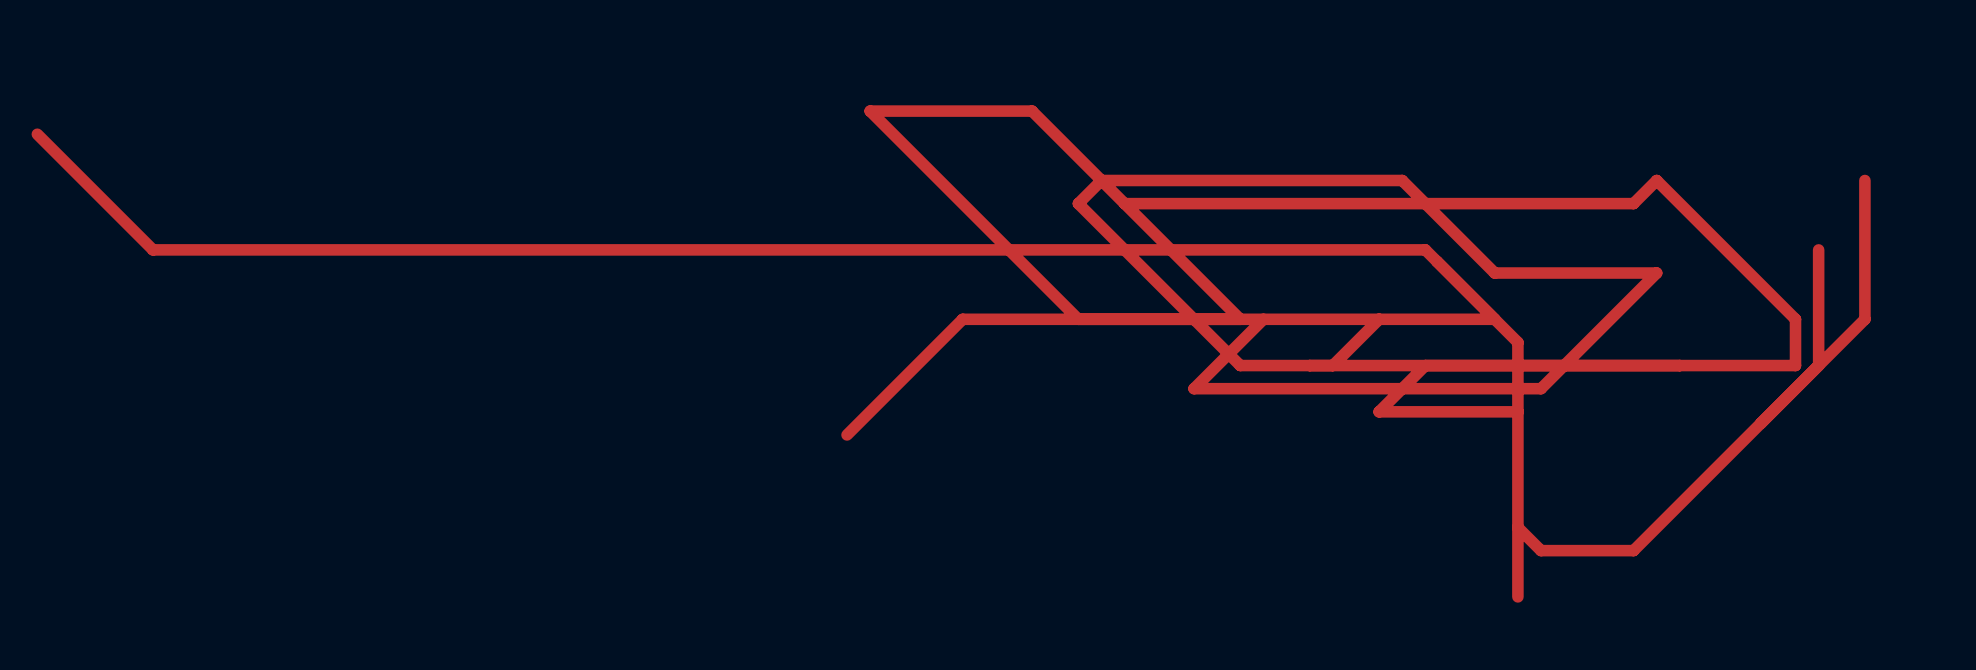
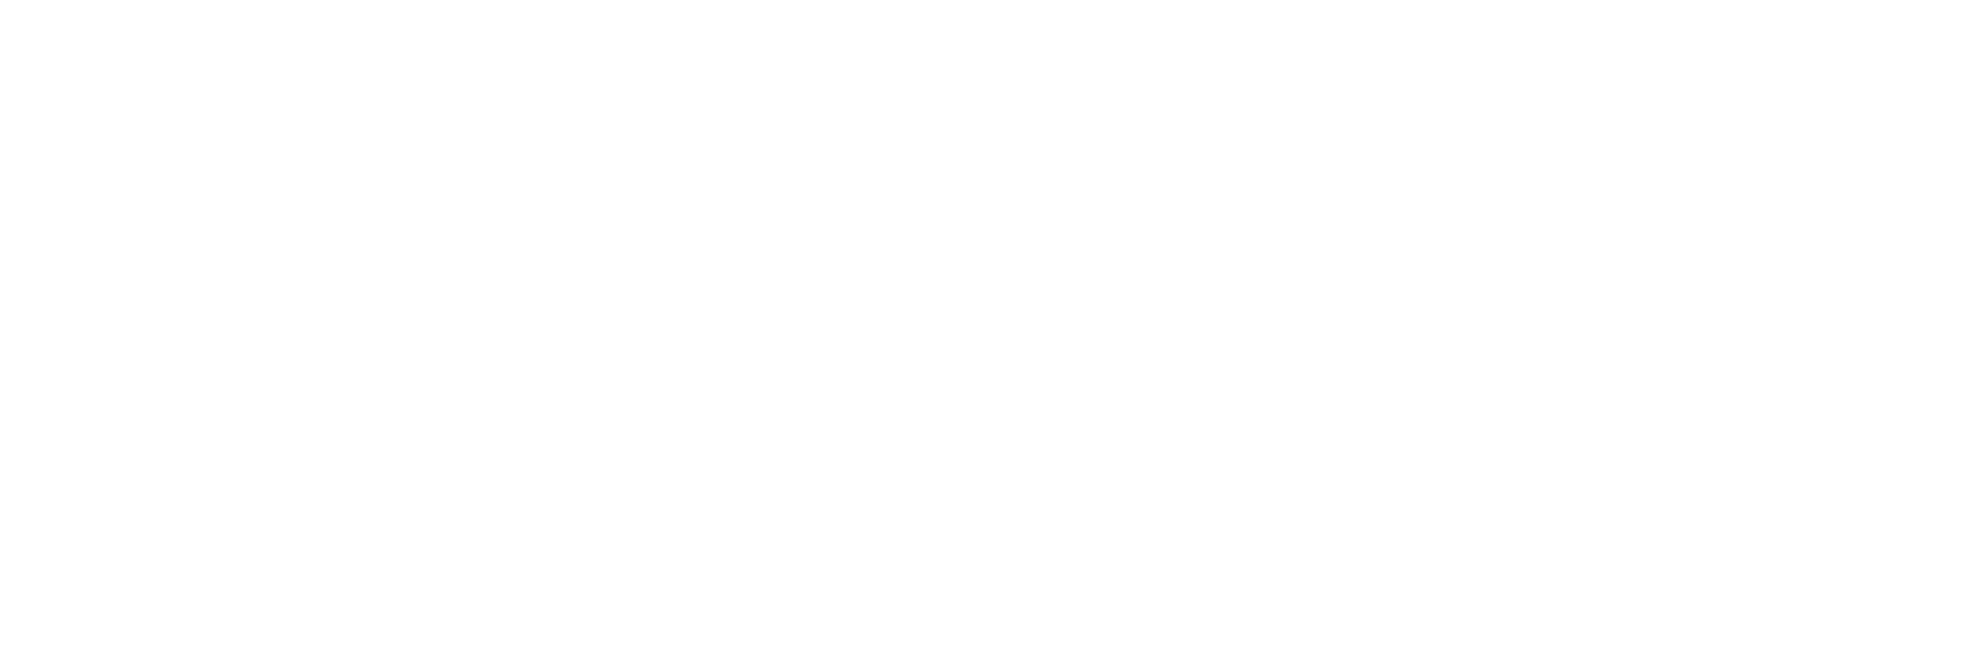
top track: (37, 134) (152, 249) (1425, 249) (1517, 342) (1517, 596) -> none
top track: (1864, 180) (1864, 319) (1633, 550) (1541, 550) (1517, 527) -> none
top track: (1124, 203) (1633, 203) (1656, 180) (1795, 319) (1795, 365) (1240, 365) (1078, 203) (1101, 180) (1402, 180) (1494, 273) (1656, 273) (1541, 388) (1194, 388) (1263, 319) -> none
top track: (1818, 249) (1818, 365) -> none
top track: (1078, 319) (870, 111) (1032, 111) (1240, 319) -> none
top track: (1379, 319) (1332, 365) -> none
top track: (1494, 319) (962, 319) (847, 434) -> none
top track: (1425, 365) (1379, 411) (1517, 411) -> none

